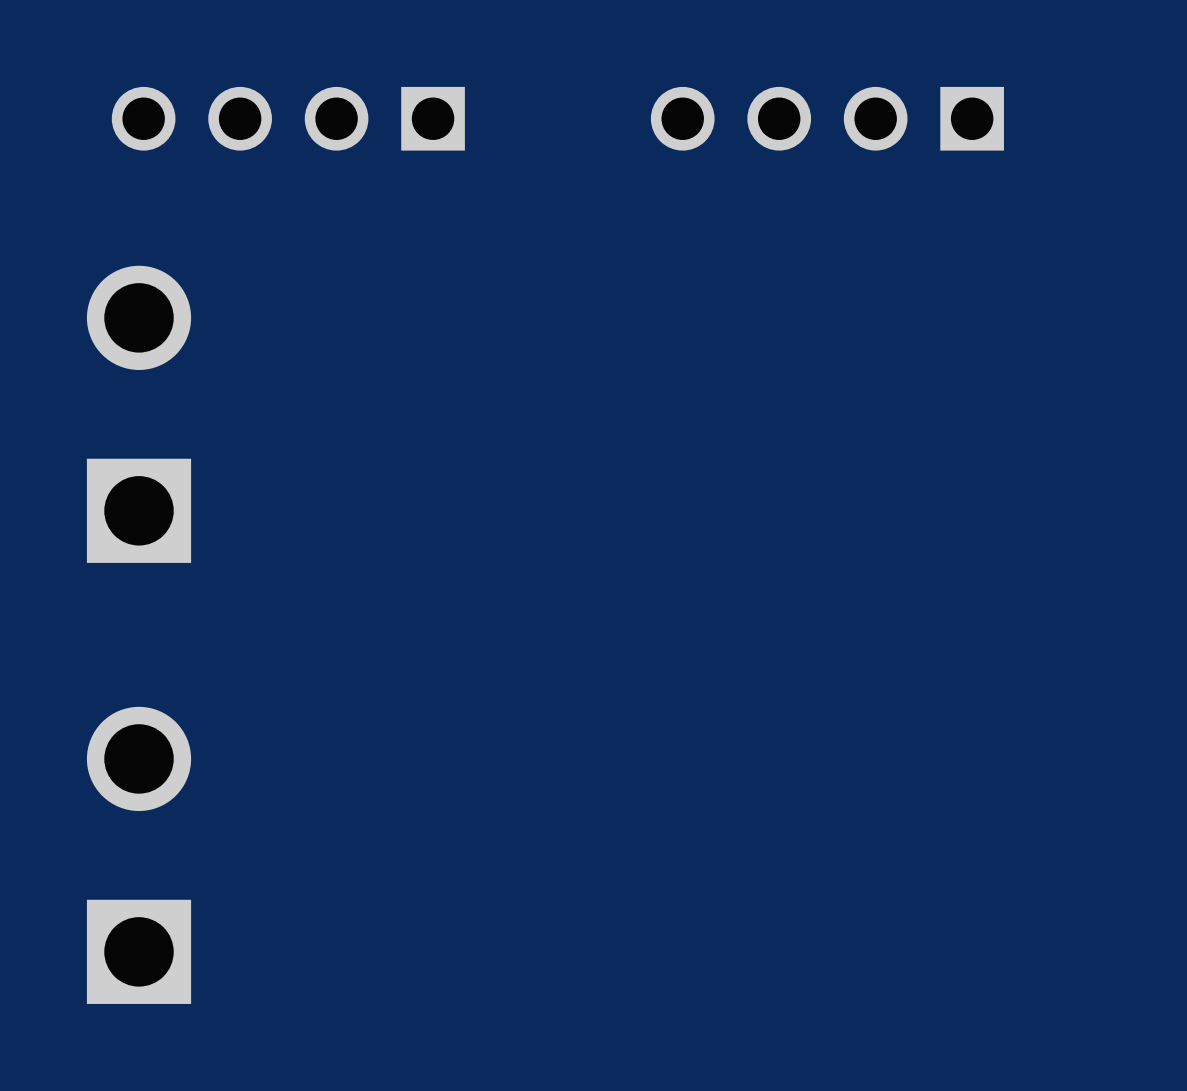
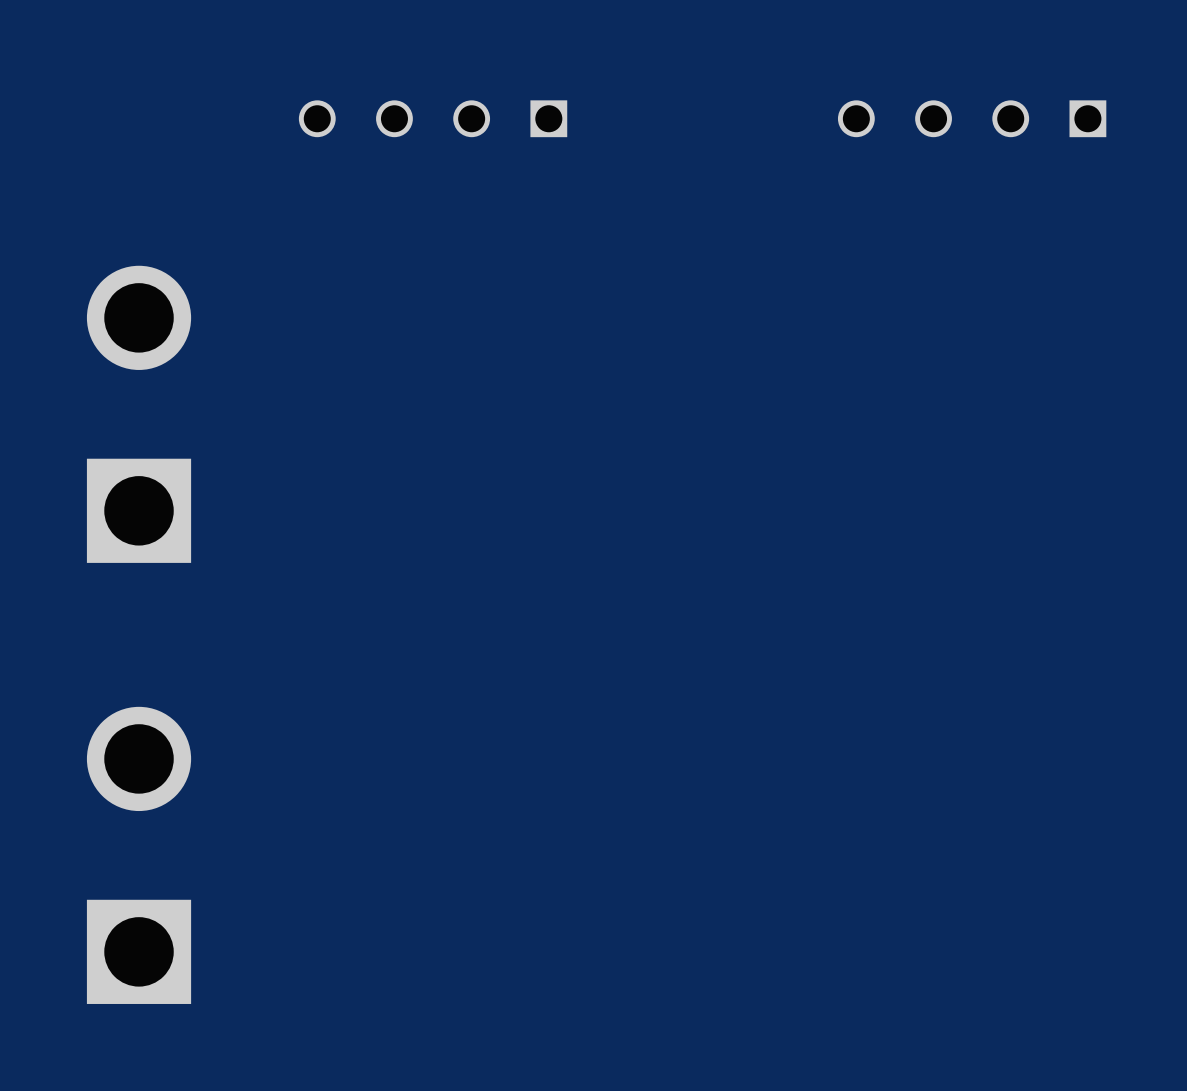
part: (288, 118) -> none
part: none -> (433, 118)
part: (827, 118) -> none
part: none -> (972, 118)

